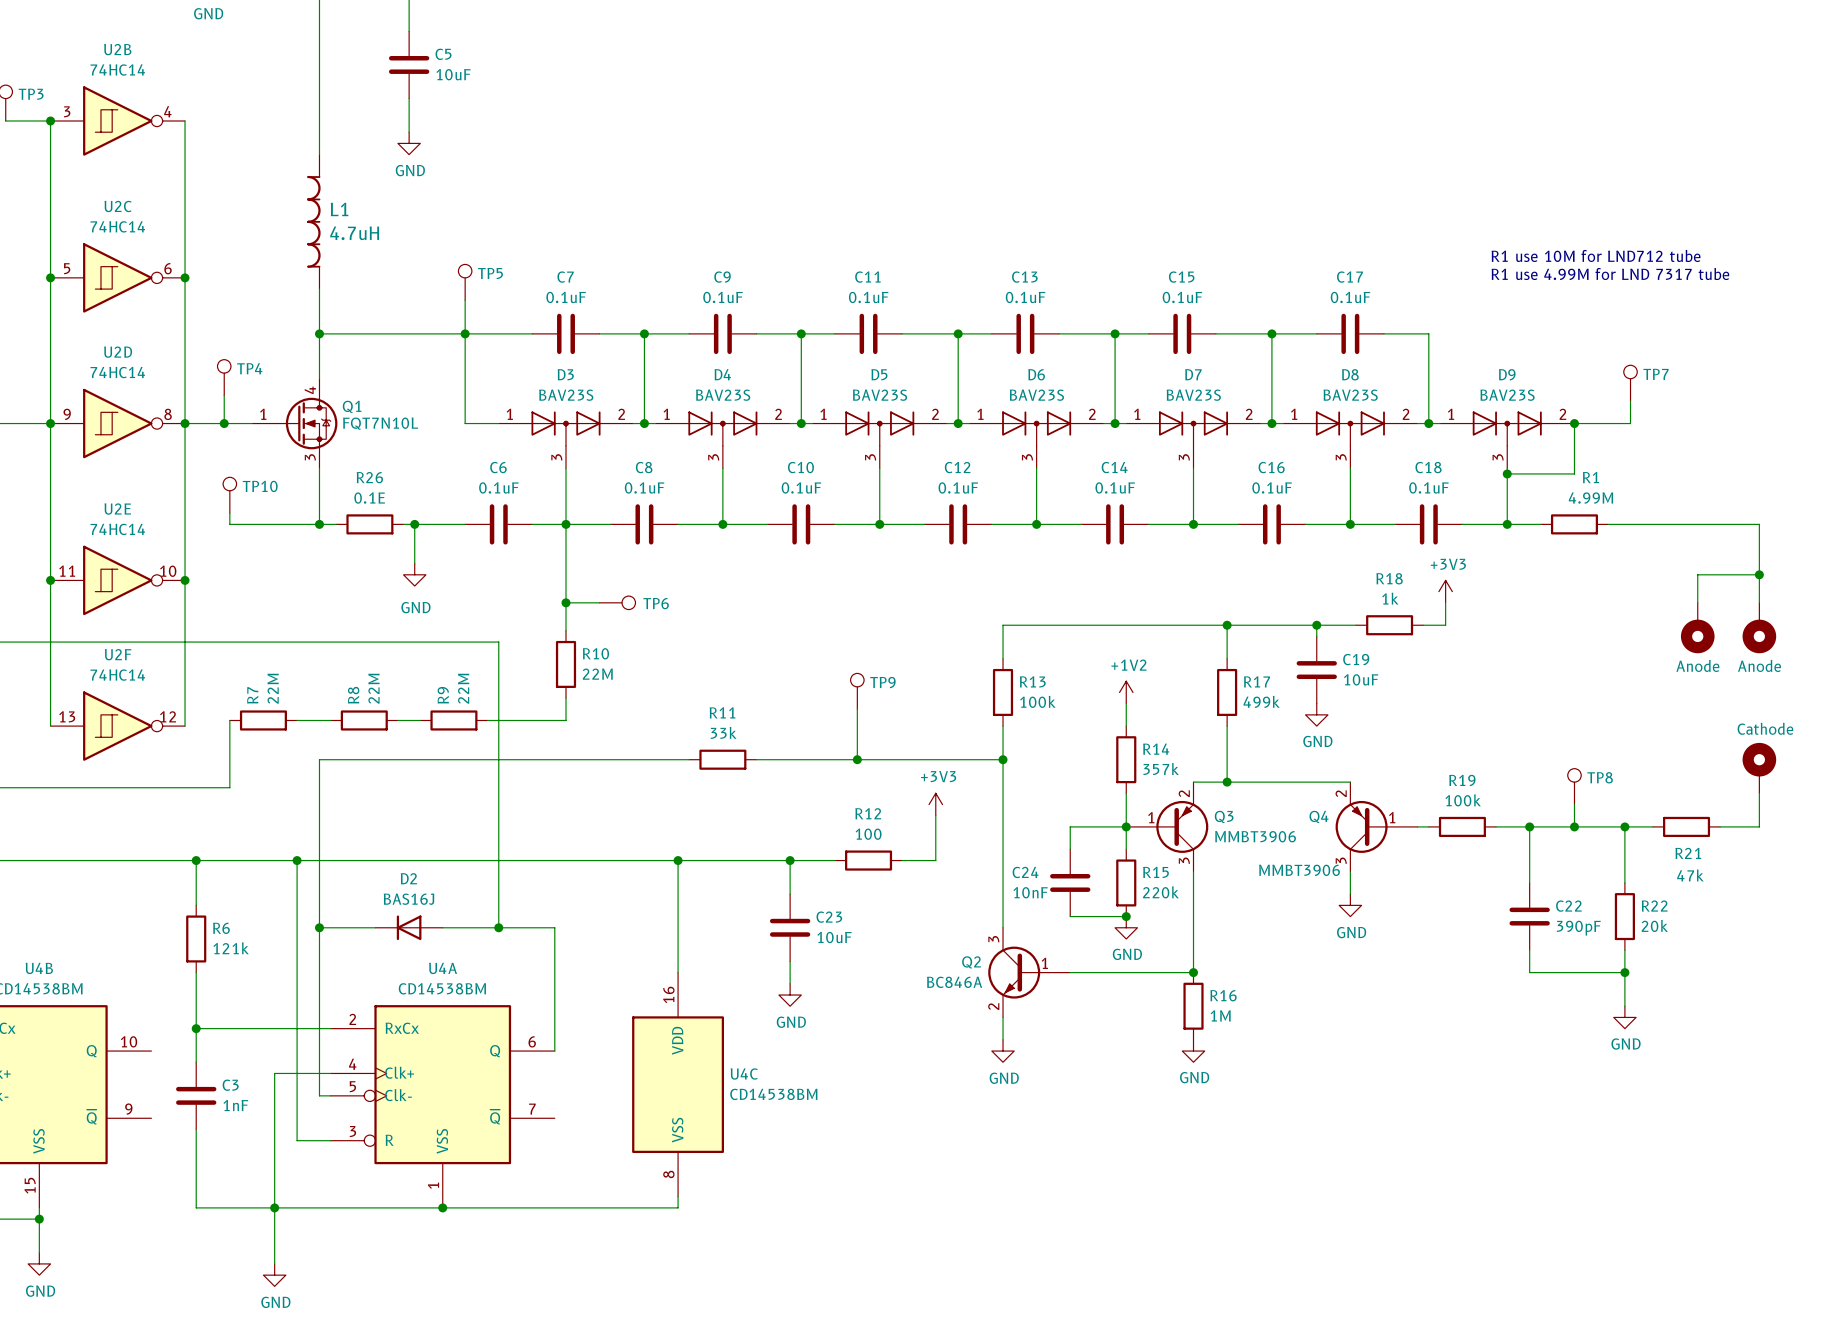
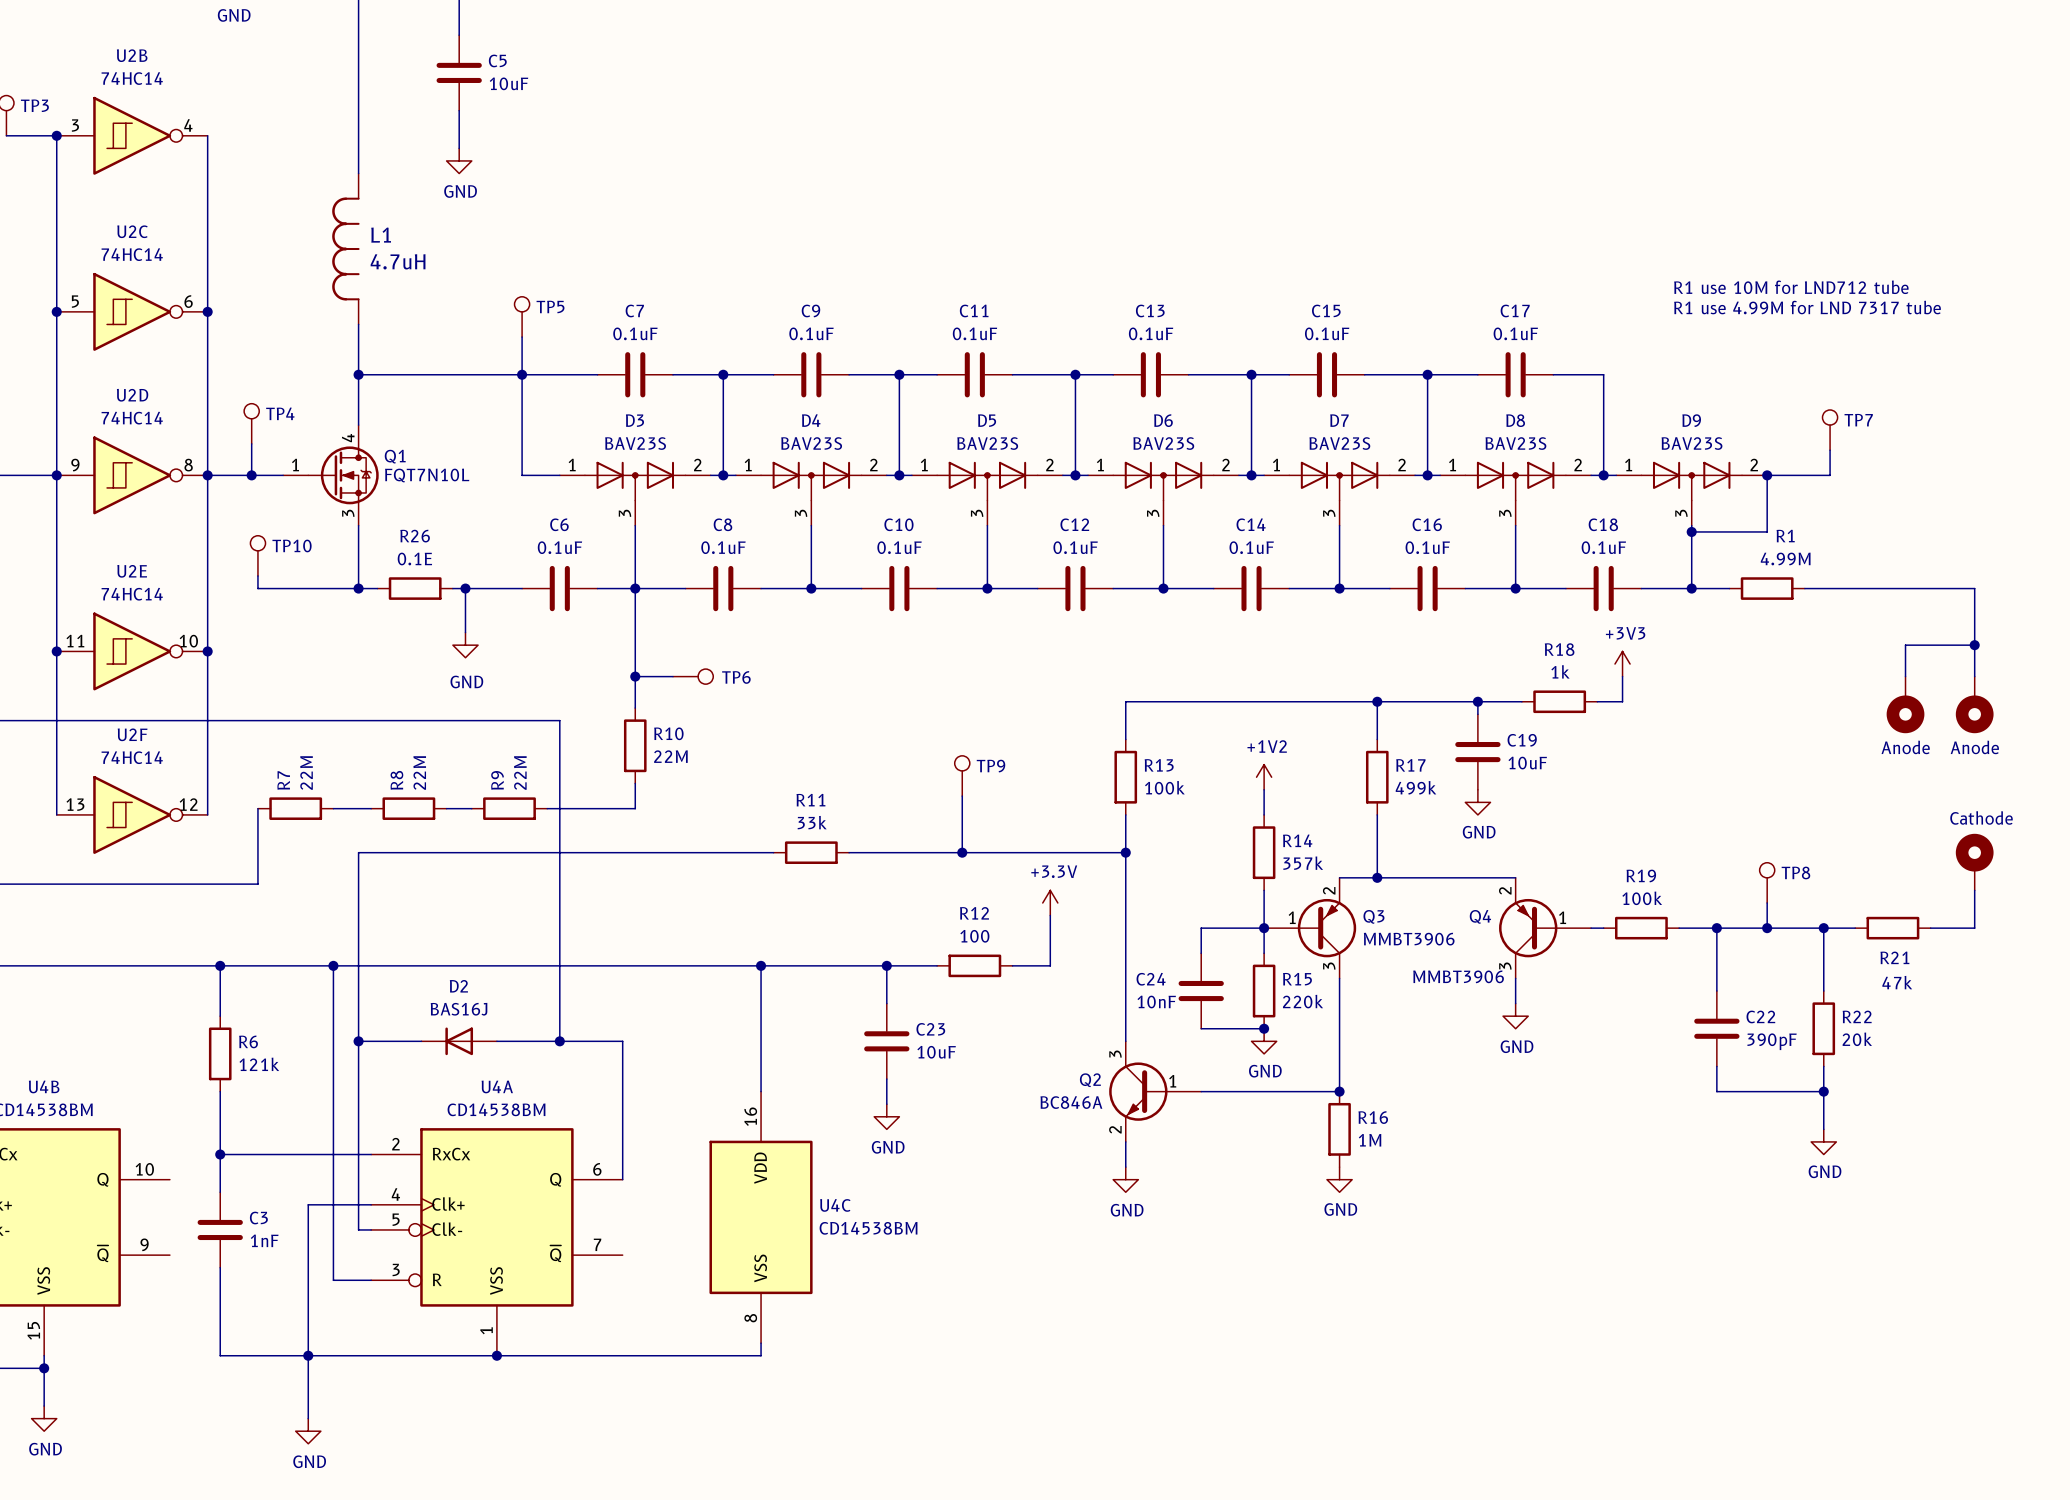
L1 symbol: [307, 154, 321, 290] -> [332, 173, 360, 325]
power symbol: +3V3 (935, 804) -> +3.3V (1050, 902)

